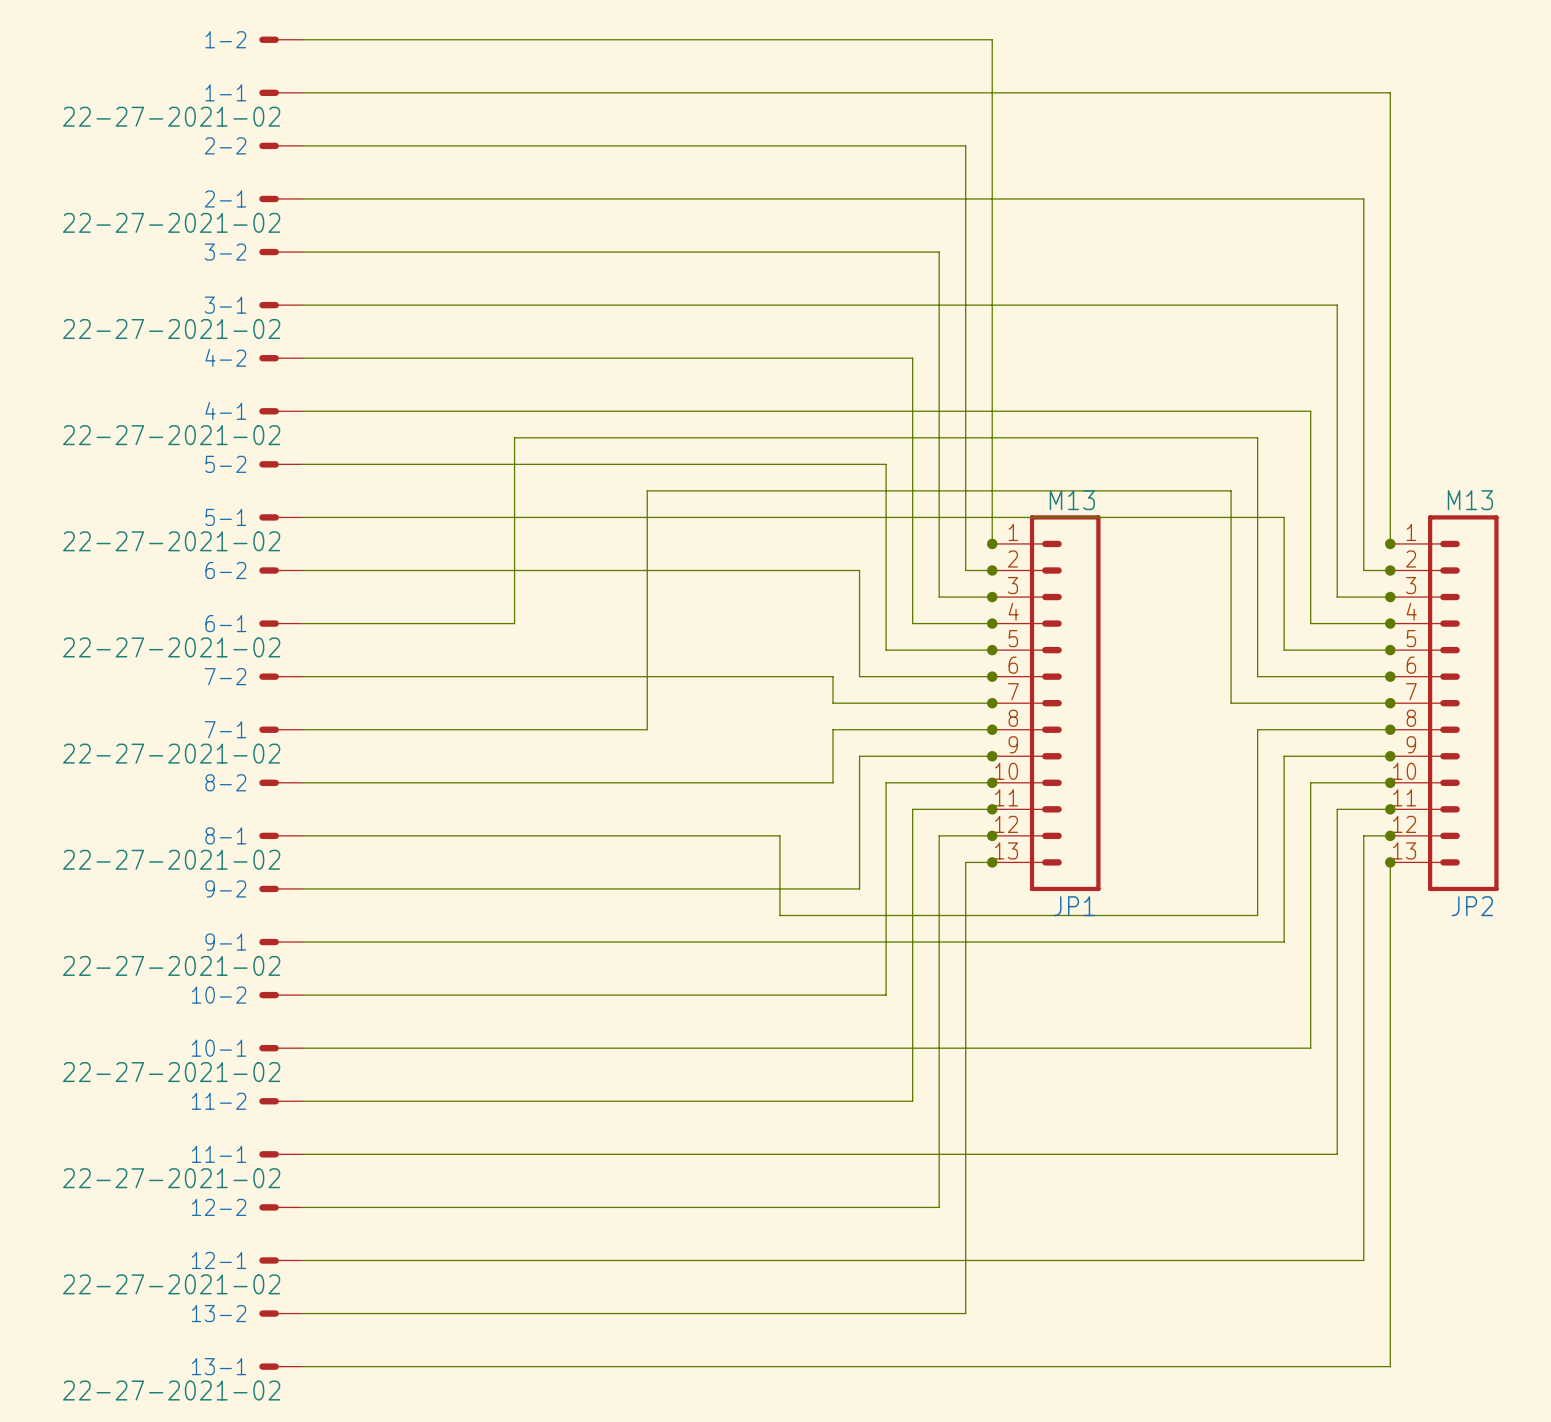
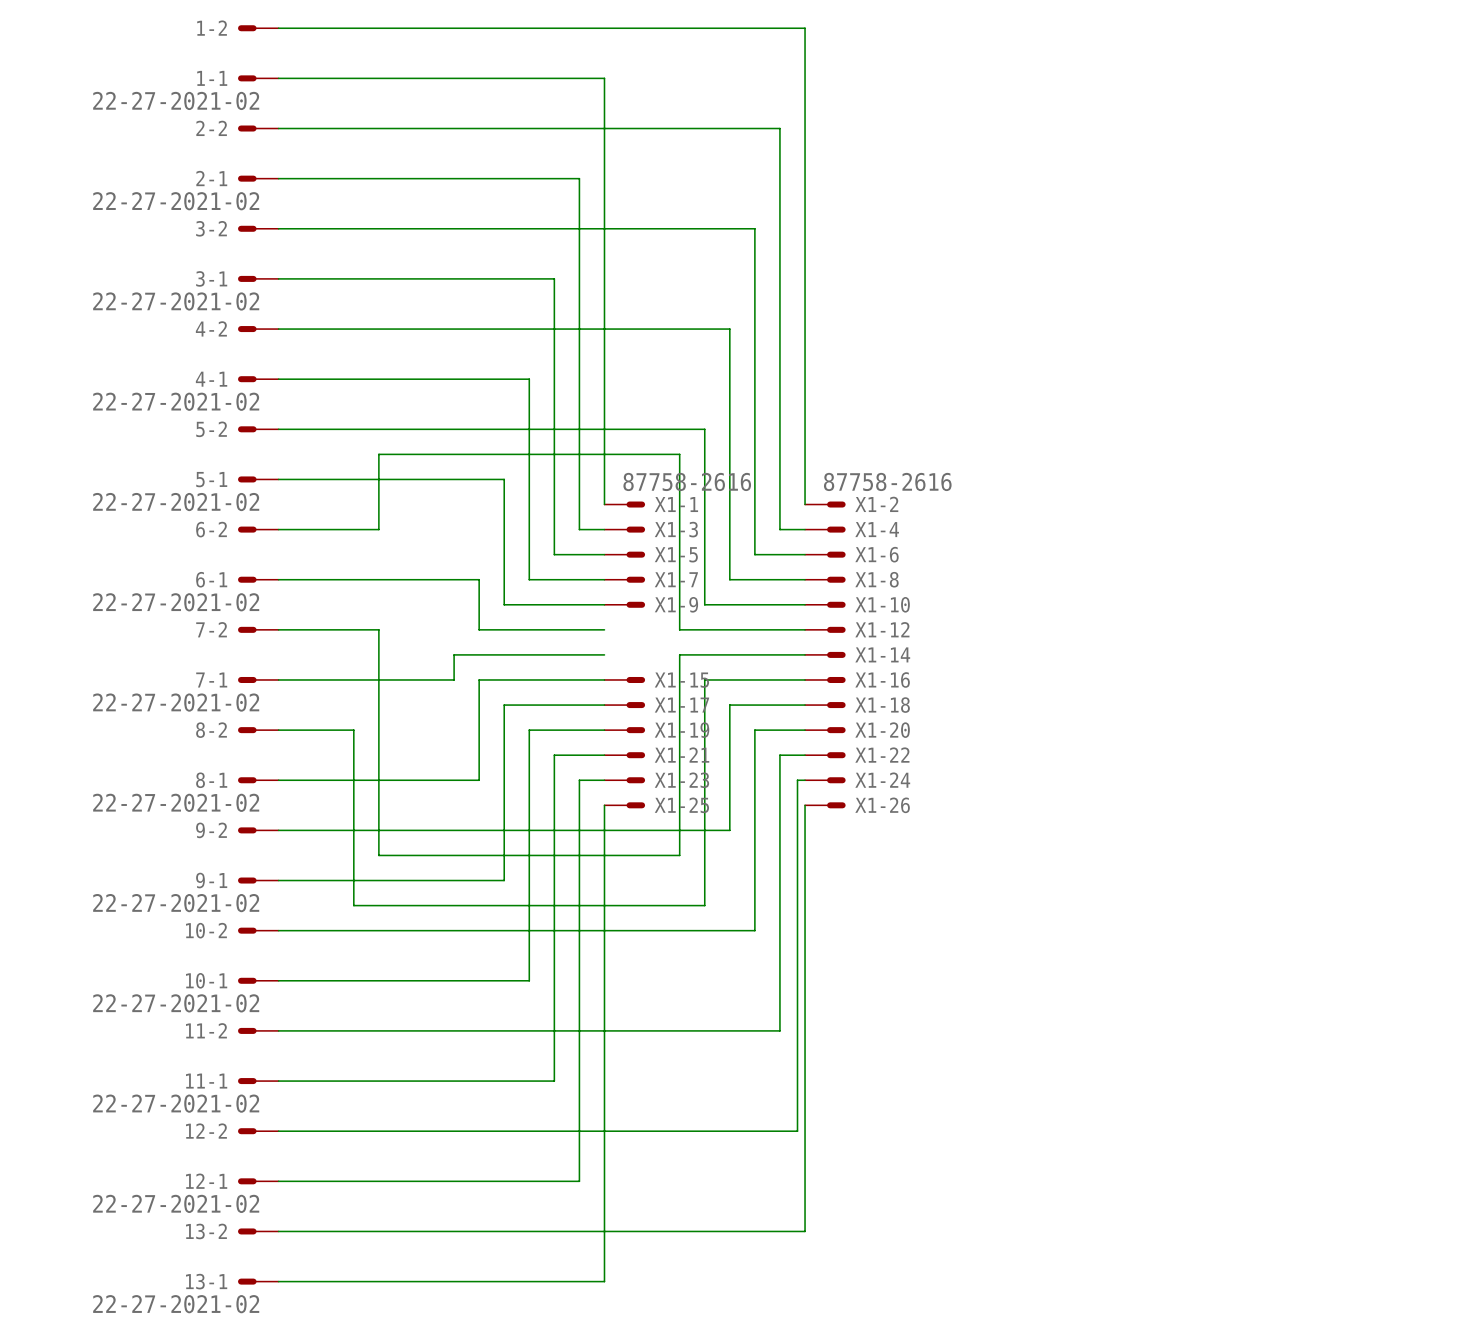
wire: (859, 39) (992, 39) (992, 543) -> (805, 28) (805, 504)
wire: (647, 92) (1390, 92) (1390, 543) -> (604, 78) (604, 454) (378, 454) (378, 529)
wire: (833, 145) (965, 145) (965, 570) (992, 570) -> (779, 128) (779, 529)
wire: (620, 198) (1363, 198) (1363, 570) (1390, 570) -> none
wire: (806, 252) (939, 252) (939, 597) (992, 597) -> (754, 228) (754, 554) (805, 554)
wire: (594, 305) (1337, 305) (1337, 597) (1390, 597) -> (554, 278) (554, 554) (604, 554)
wire: (779, 358) (912, 358) (912, 623) (992, 623) -> (729, 329) (729, 579) (805, 579)
wire: (567, 411) (1310, 411) (1310, 623) (1390, 623) -> (529, 379) (529, 579) (604, 579)
wire: (753, 464) (886, 464) (886, 650) (992, 650) -> (704, 429) (704, 604) (805, 604)
wire: (726, 490) (1231, 490) (1231, 703) (1390, 703) -> none
wire: (541, 517) (1284, 517) (1284, 650) (1390, 650) -> (504, 479) (504, 604) (604, 604)
wire: (647, 543) (647, 729) -> none
X1-1: none -> 87758-2616 (624, 504)
X1-2: none -> 87758-2616 (825, 504)
junction: (992, 543) -> none
junction: (1390, 543) -> none
wire: (408, 570) (620, 570) -> (579, 178) (579, 529)
wire: (647, 570) (833, 570) -> none
X1-3: none -> (624, 529)
wire: (859, 570) (859, 676) (992, 676) -> none
X1-4: none -> (825, 529)
junction: (992, 570) -> none
junction: (1390, 570) -> none
X1-5: none -> (624, 554)
X1-6: none -> (825, 554)
junction: (992, 597) -> none
junction: (1390, 597) -> none
wire: (514, 623) (514, 437) (1257, 437) (1257, 676) (1390, 676) -> none
X1-7: none -> (624, 579)
X1-8: none -> (825, 579)
junction: (992, 623) -> none
junction: (1390, 623) -> none
X1-9: none -> (624, 604)
X1-10: none -> (825, 604)
junction: (992, 650) -> none
junction: (1390, 650) -> none
wire: (408, 676) (514, 676) -> (479, 579) (479, 629)
wire: none -> (378, 629) (378, 855) (679, 855) (679, 654) (779, 654)
wire: (647, 676) (726, 676) -> (679, 454) (679, 629)
wire: (833, 676) (833, 703) -> (779, 629) (805, 629)
X1-12: none -> (825, 629)
junction: (992, 676) -> none
junction: (1390, 676) -> none
wire: none -> (604, 654) (454, 654) (454, 679)
wire: (859, 703) (992, 703) -> none
X1-14: none -> (825, 654)
junction: (992, 703) -> none
JP1: M13 (1046, 703) -> none
junction: (1390, 703) -> none
JP2: M13 (1444, 703) -> none
wire: (488, 729) (514, 729) -> (479, 780) (479, 679)
X1-15: none -> (624, 679)
wire: (833, 729) (833, 782) -> (805, 730) (779, 730)
wire: (859, 729) (992, 729) -> none
X1-16: none -> (825, 679)
junction: (992, 729) -> none
wire: (1390, 729) (1257, 729) (1257, 915) (779, 915) (779, 888) (859, 888) -> none
junction: (1390, 729) -> none
X1-17: none -> (624, 705)
X1-18: none -> (825, 705)
wire: (992, 756) (859, 756) (859, 862) -> none
junction: (992, 756) -> none
wire: (1390, 756) (1284, 756) (1284, 942) (541, 942) -> (604, 705) (504, 705) (504, 880)
junction: (1390, 756) -> none
wire: (381, 782) (567, 782) -> (353, 730) (353, 905) (704, 905) (704, 679) (779, 679)
wire: (647, 782) (806, 782) -> none
X1-19: none -> (624, 730)
X1-20: none -> (825, 730)
wire: (992, 782) (886, 782) (886, 995) (806, 995) -> (754, 730) (754, 930)
junction: (992, 782) -> none
wire: (1390, 782) (1310, 782) (1310, 1048) (567, 1048) -> (529, 730) (529, 980)
junction: (1390, 782) -> none
X1-21: none -> (624, 755)
X1-22: none -> (825, 755)
wire: (992, 809) (912, 809) (912, 1101) (833, 1101) -> (805, 755) (779, 755) (779, 1030)
junction: (992, 809) -> none
wire: (1390, 809) (1337, 809) (1337, 1154) (594, 1154) -> (604, 755) (554, 755) (554, 1081)
junction: (1390, 809) -> none
wire: (514, 835) (620, 835) -> (579, 1181) (579, 780)
wire: (647, 835) (779, 835) -> (805, 705) (729, 705) (729, 780)
X1-23: none -> (624, 780)
X1-24: none -> (825, 780)
wire: (992, 835) (939, 835) (939, 1207) (851, 1207) -> (805, 780) (797, 780) (797, 1131)
junction: (992, 835) -> none
wire: (1390, 835) (1363, 835) (1363, 1260) (620, 1260) -> none
junction: (1390, 835) -> none
X1-25: none -> (624, 805)
X1-26: none -> (825, 805)
wire: (992, 862) (965, 862) (965, 1313) (859, 1313) -> (805, 830) (805, 1231)
junction: (992, 862) -> none
wire: (1390, 862) (1390, 1366) (647, 1366) -> (604, 805) (604, 1281)
junction: (1390, 862) -> none

